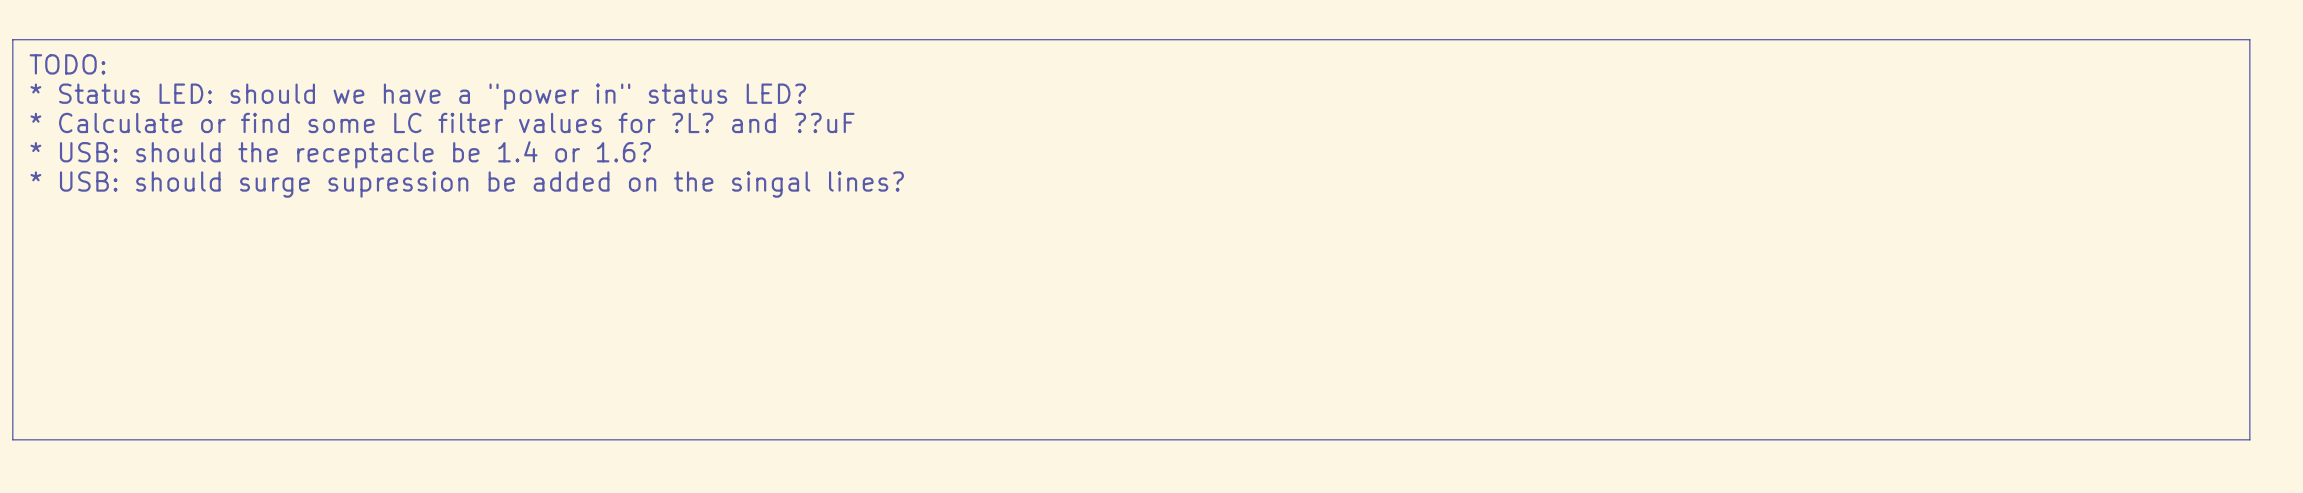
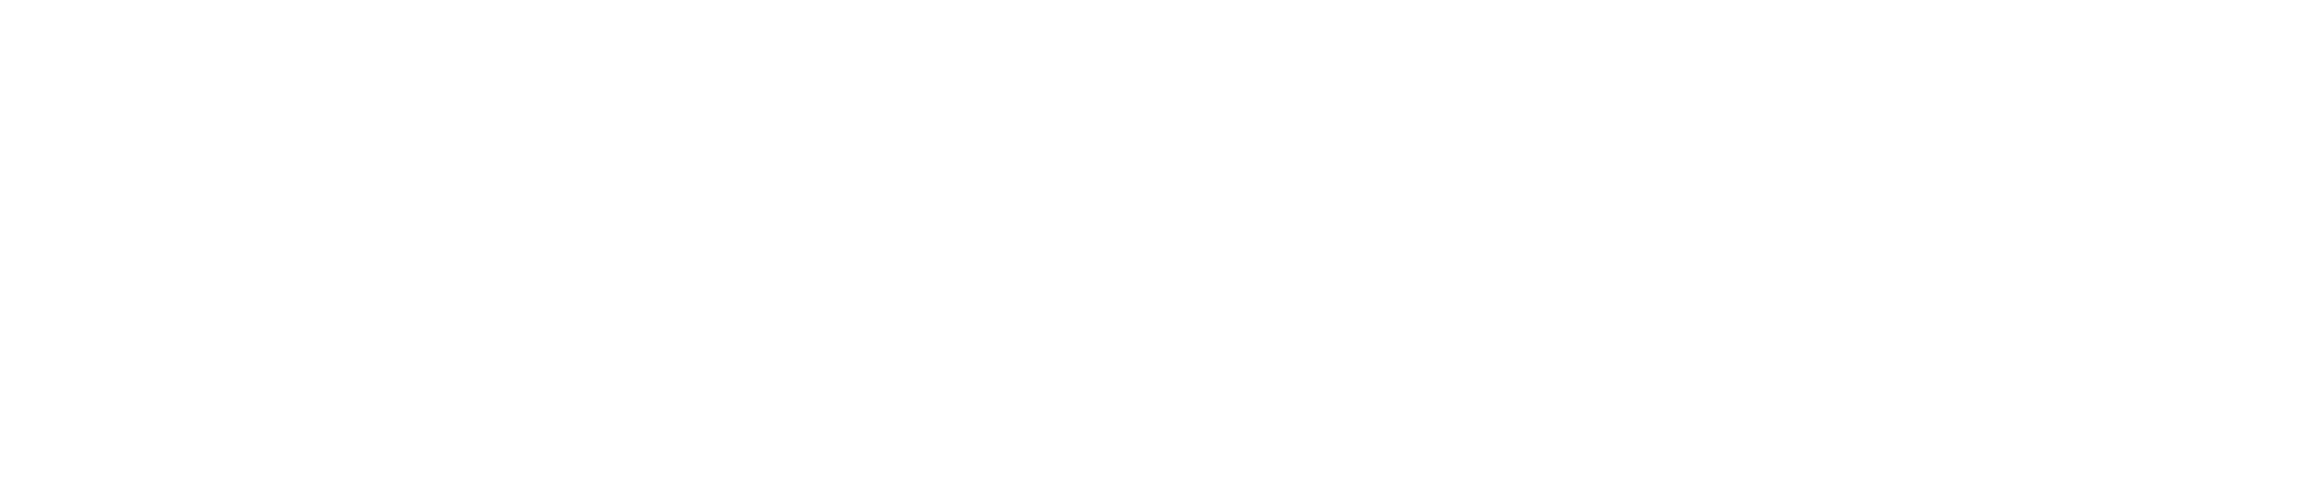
line: (12, 39) (2249, 39) (2249, 439) (12, 439) (12, 39) -> none
text: TODO: (67, 64) -> none
text: * Status LED: should we have a "power in" status LED? (418, 96) -> none
text: * Calculate or find some LC filter values for ?L? and ??uF (442, 122) -> none
text: * USB: should the receptacle be 1.4 or 1.6? (340, 154) -> none
text: * USB: should surge supression be added on the singal lines? (467, 184) -> none

